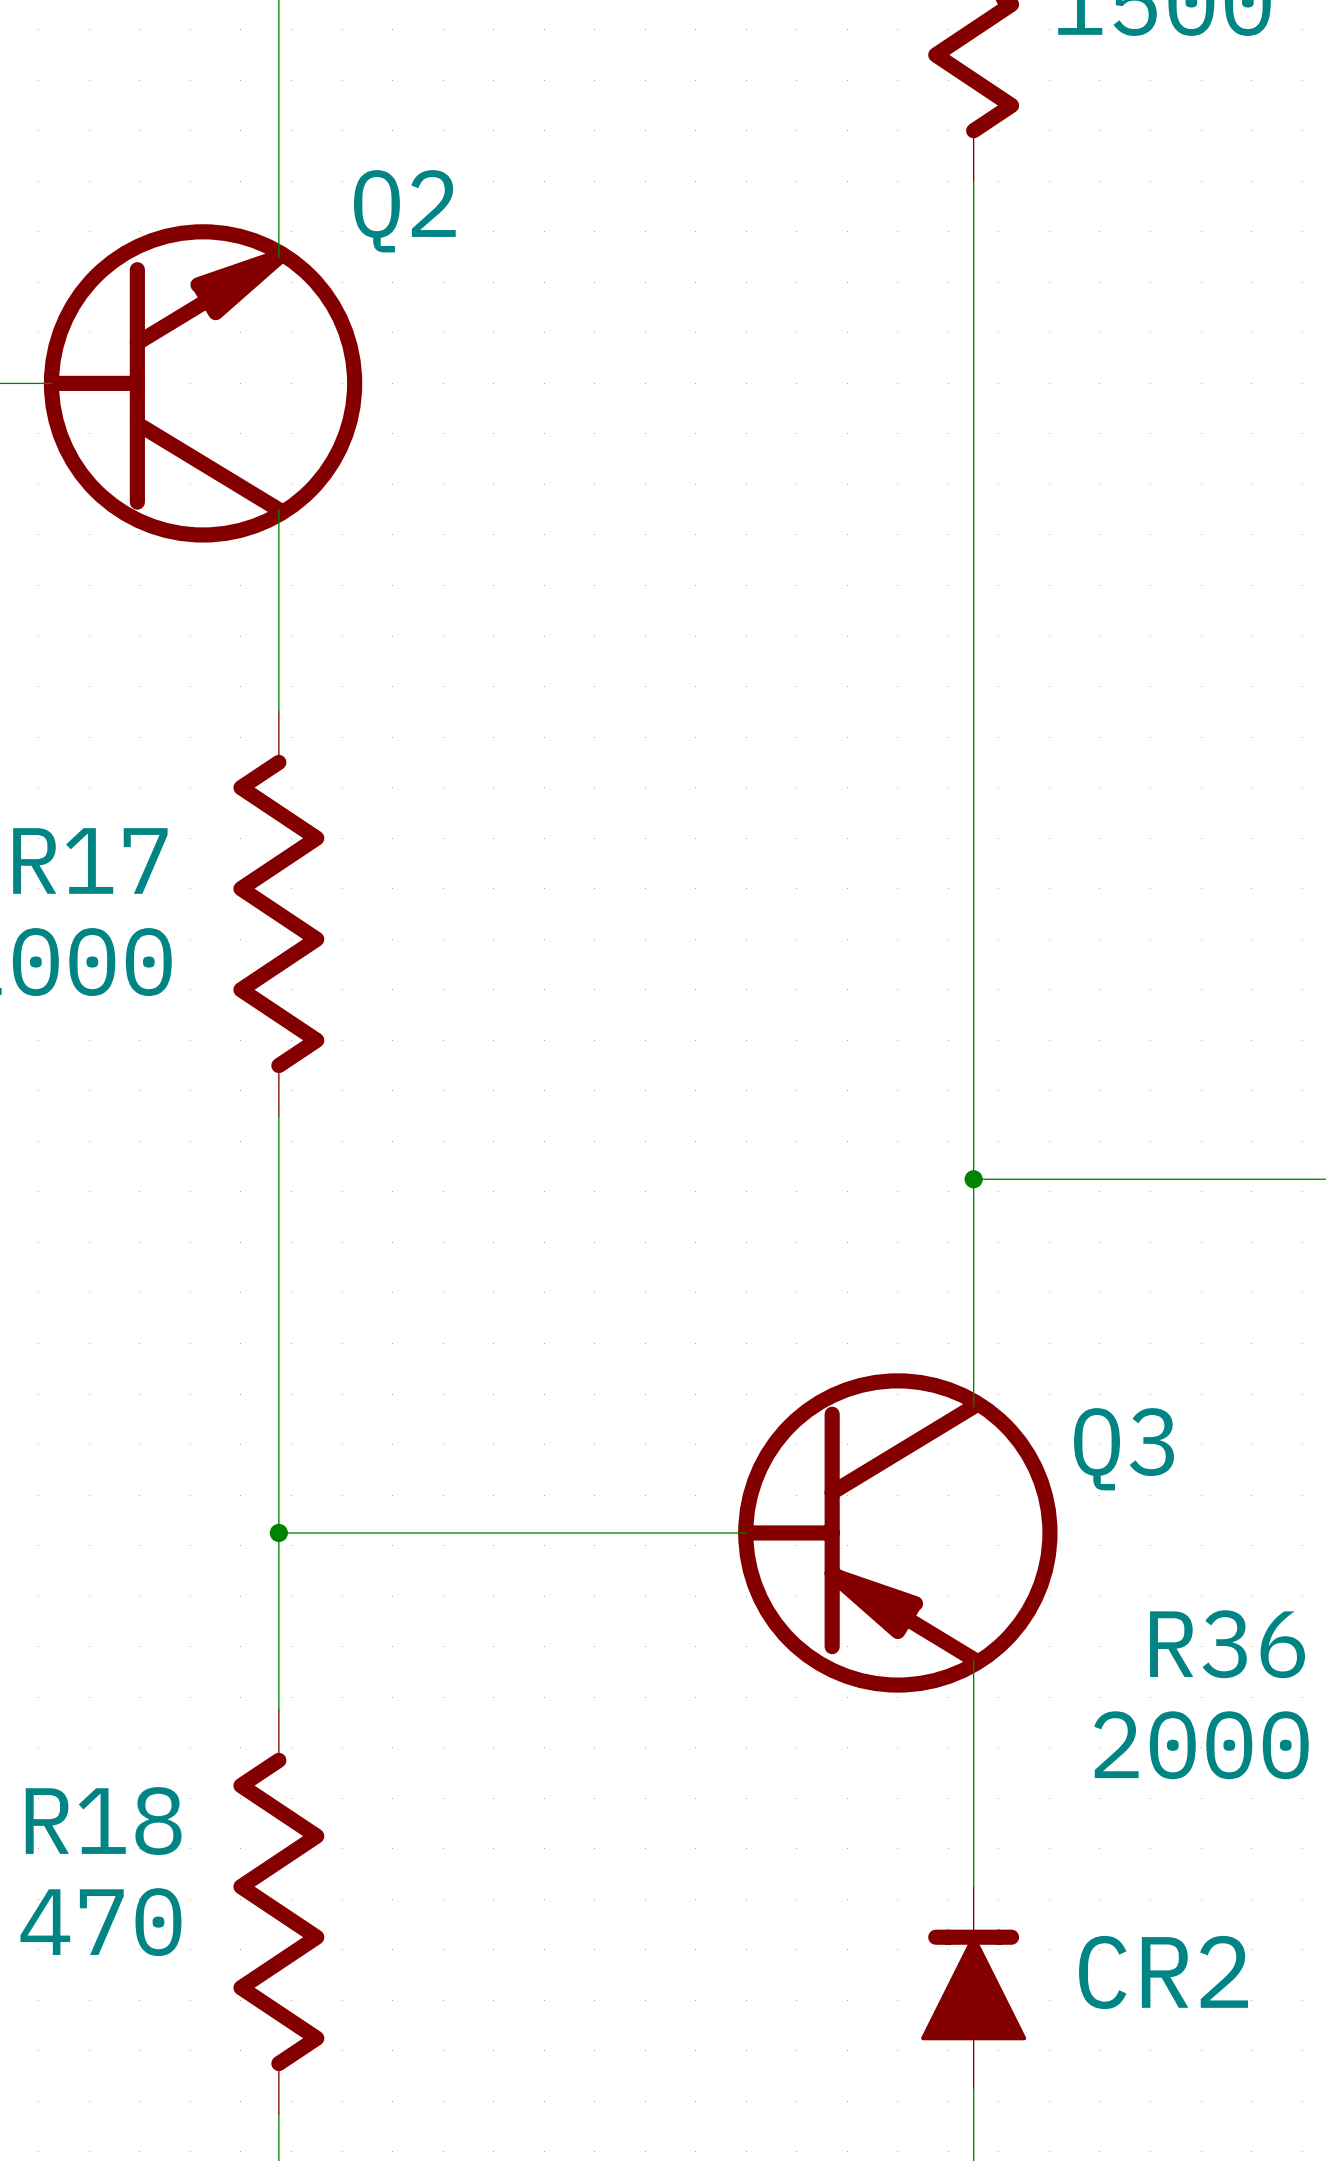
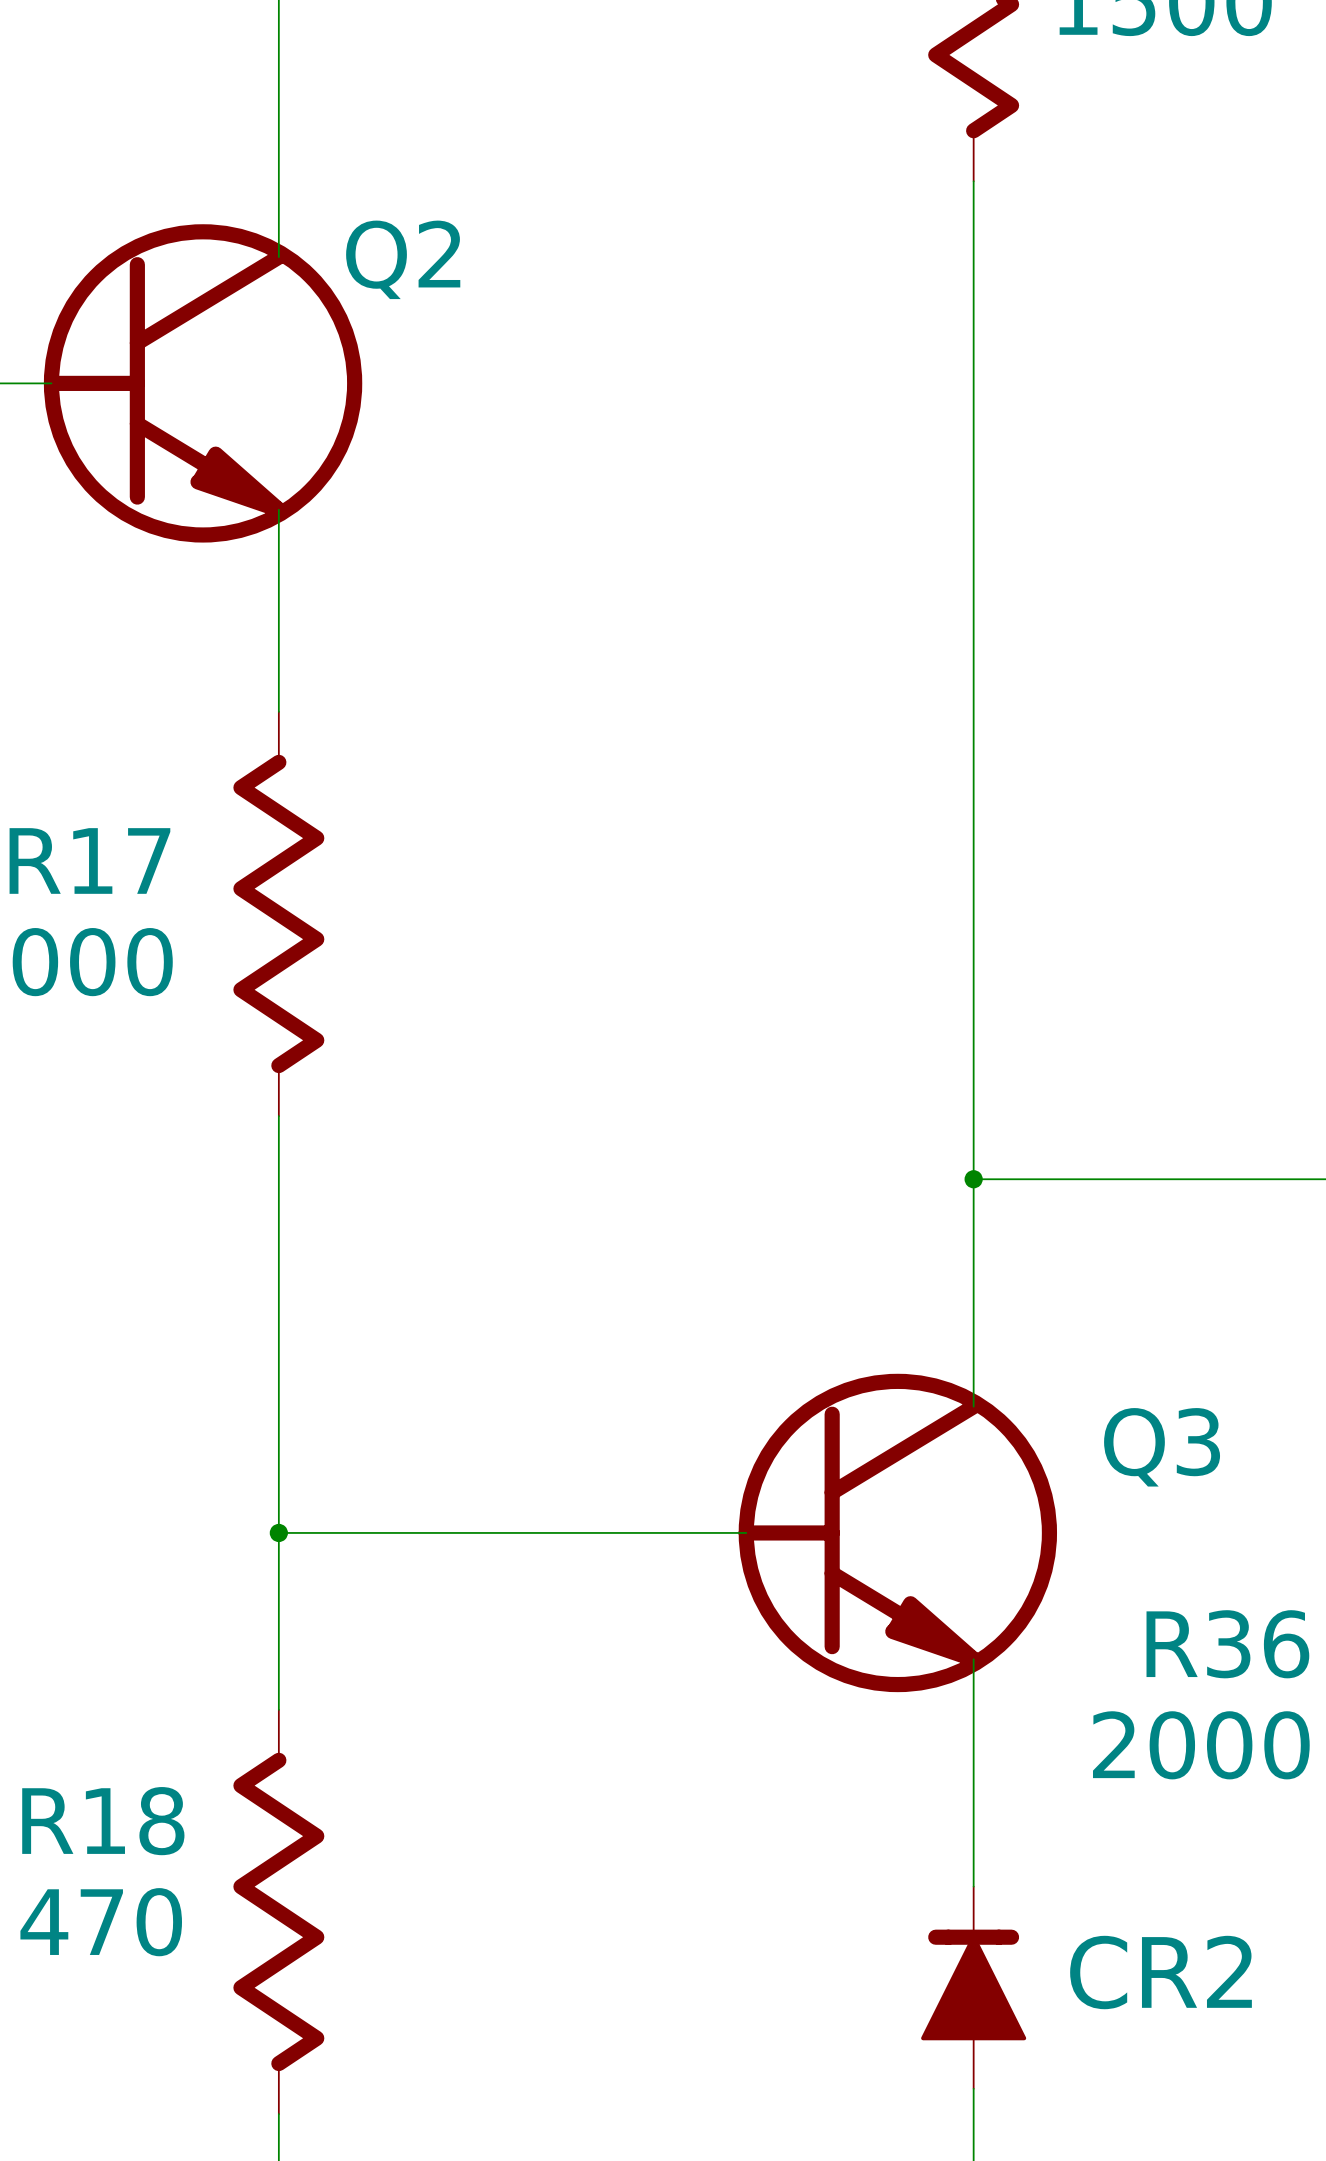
Q2 name position: Q2 (404, 211) -> Q2 (403, 259)
Q2 flip: as is (203, 383) -> up-down (203, 383)
Q3 symbol: [738, 1373, 1058, 1693] -> [738, 1373, 1058, 1693]
Q3 name position: Q3 (1124, 1449) -> Q3 (1162, 1447)

